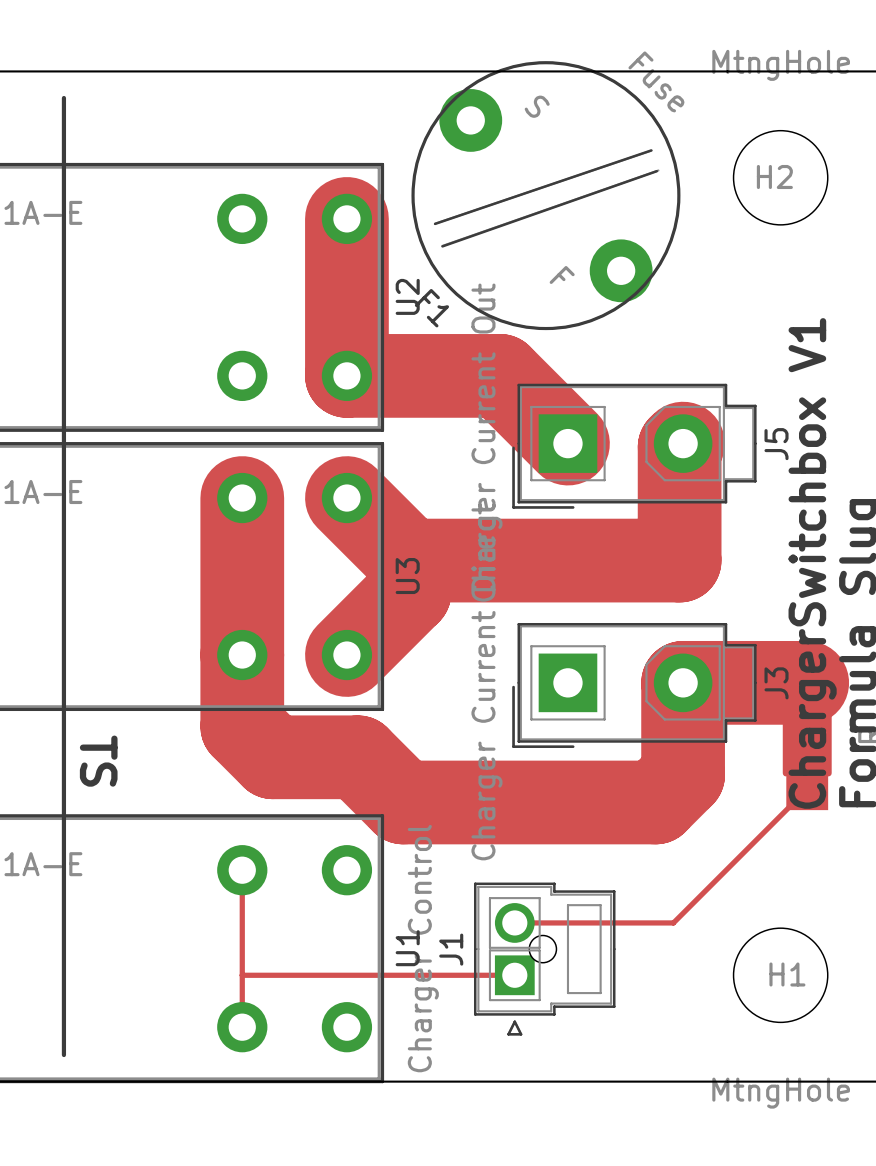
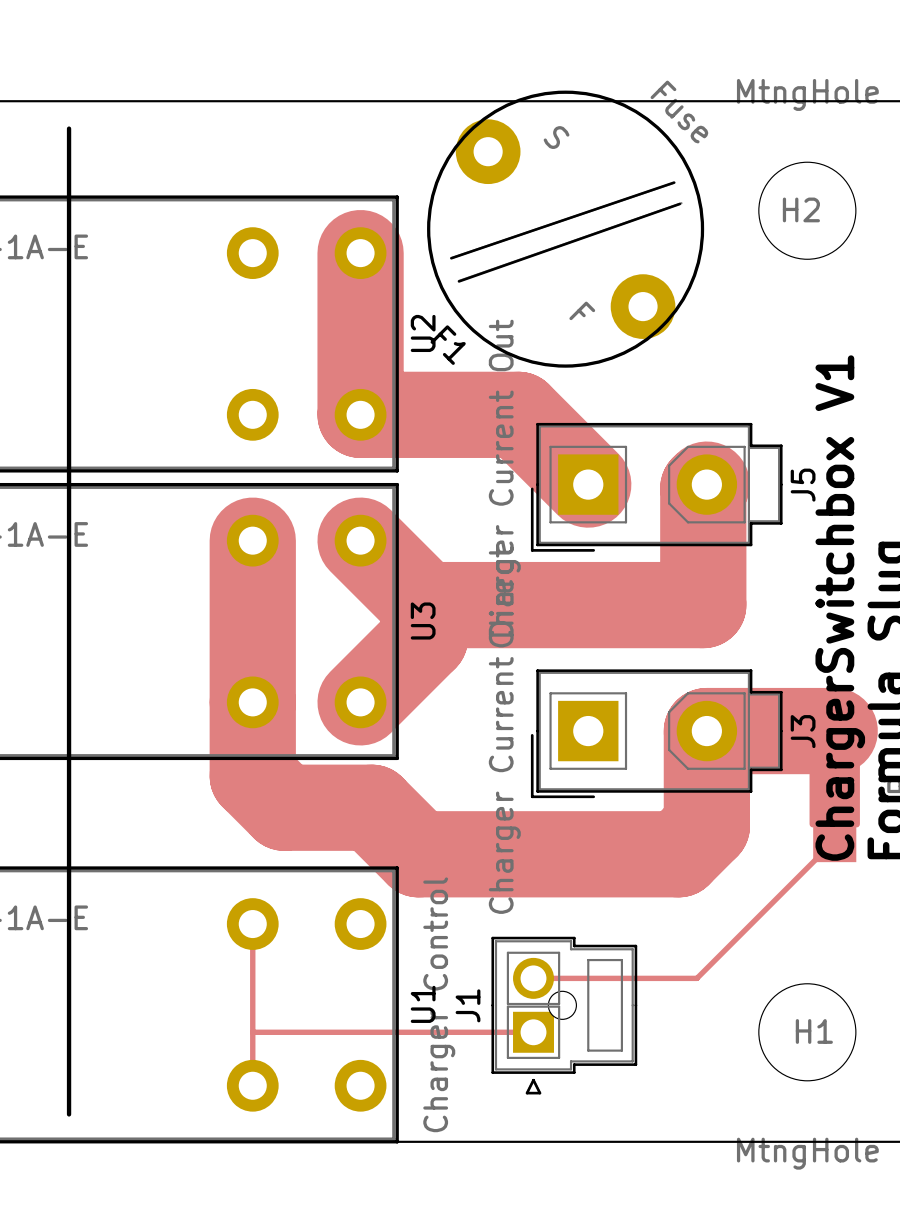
text: TS (98, 761) -> none

